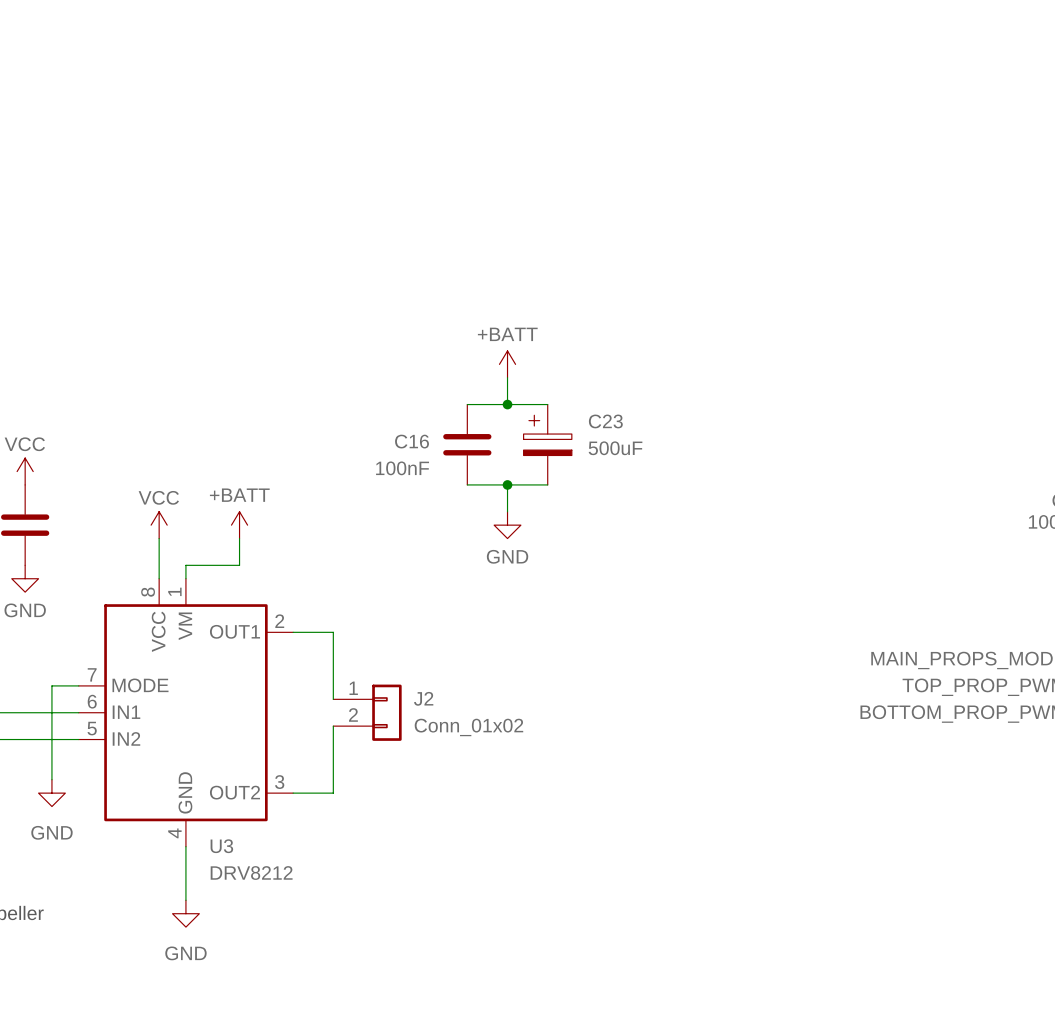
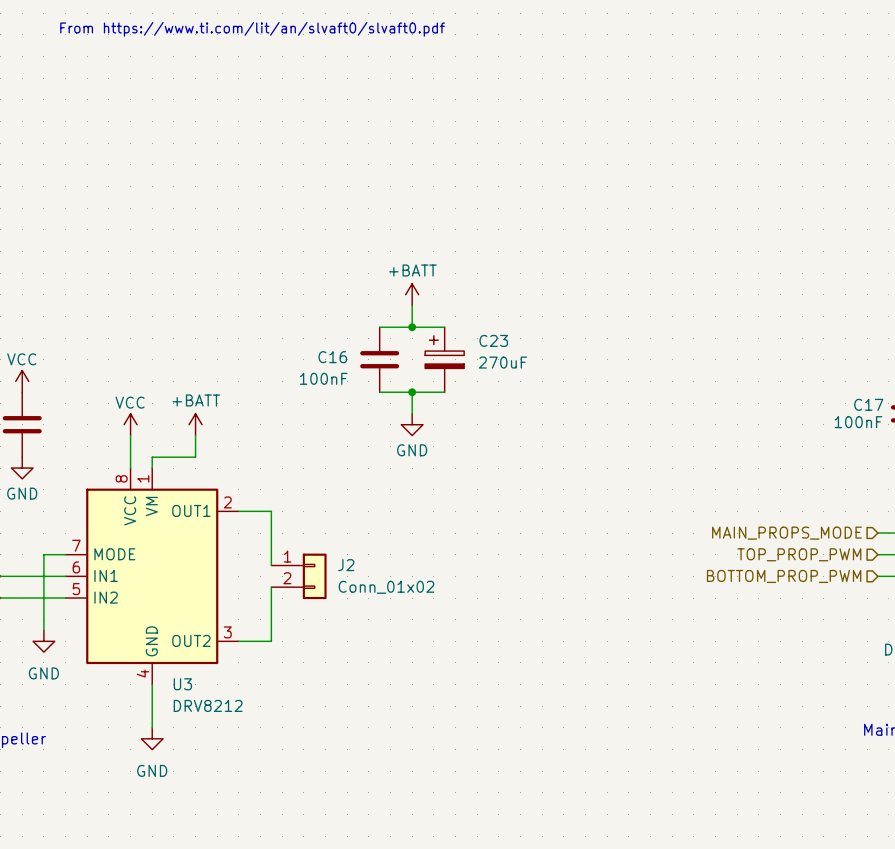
text: none -> From https://www.ti.com/lit/an/slvaft0/slvaft0.pdf (252, 29)
C23 value: 500uF (615, 448) -> 270uF (503, 362)

